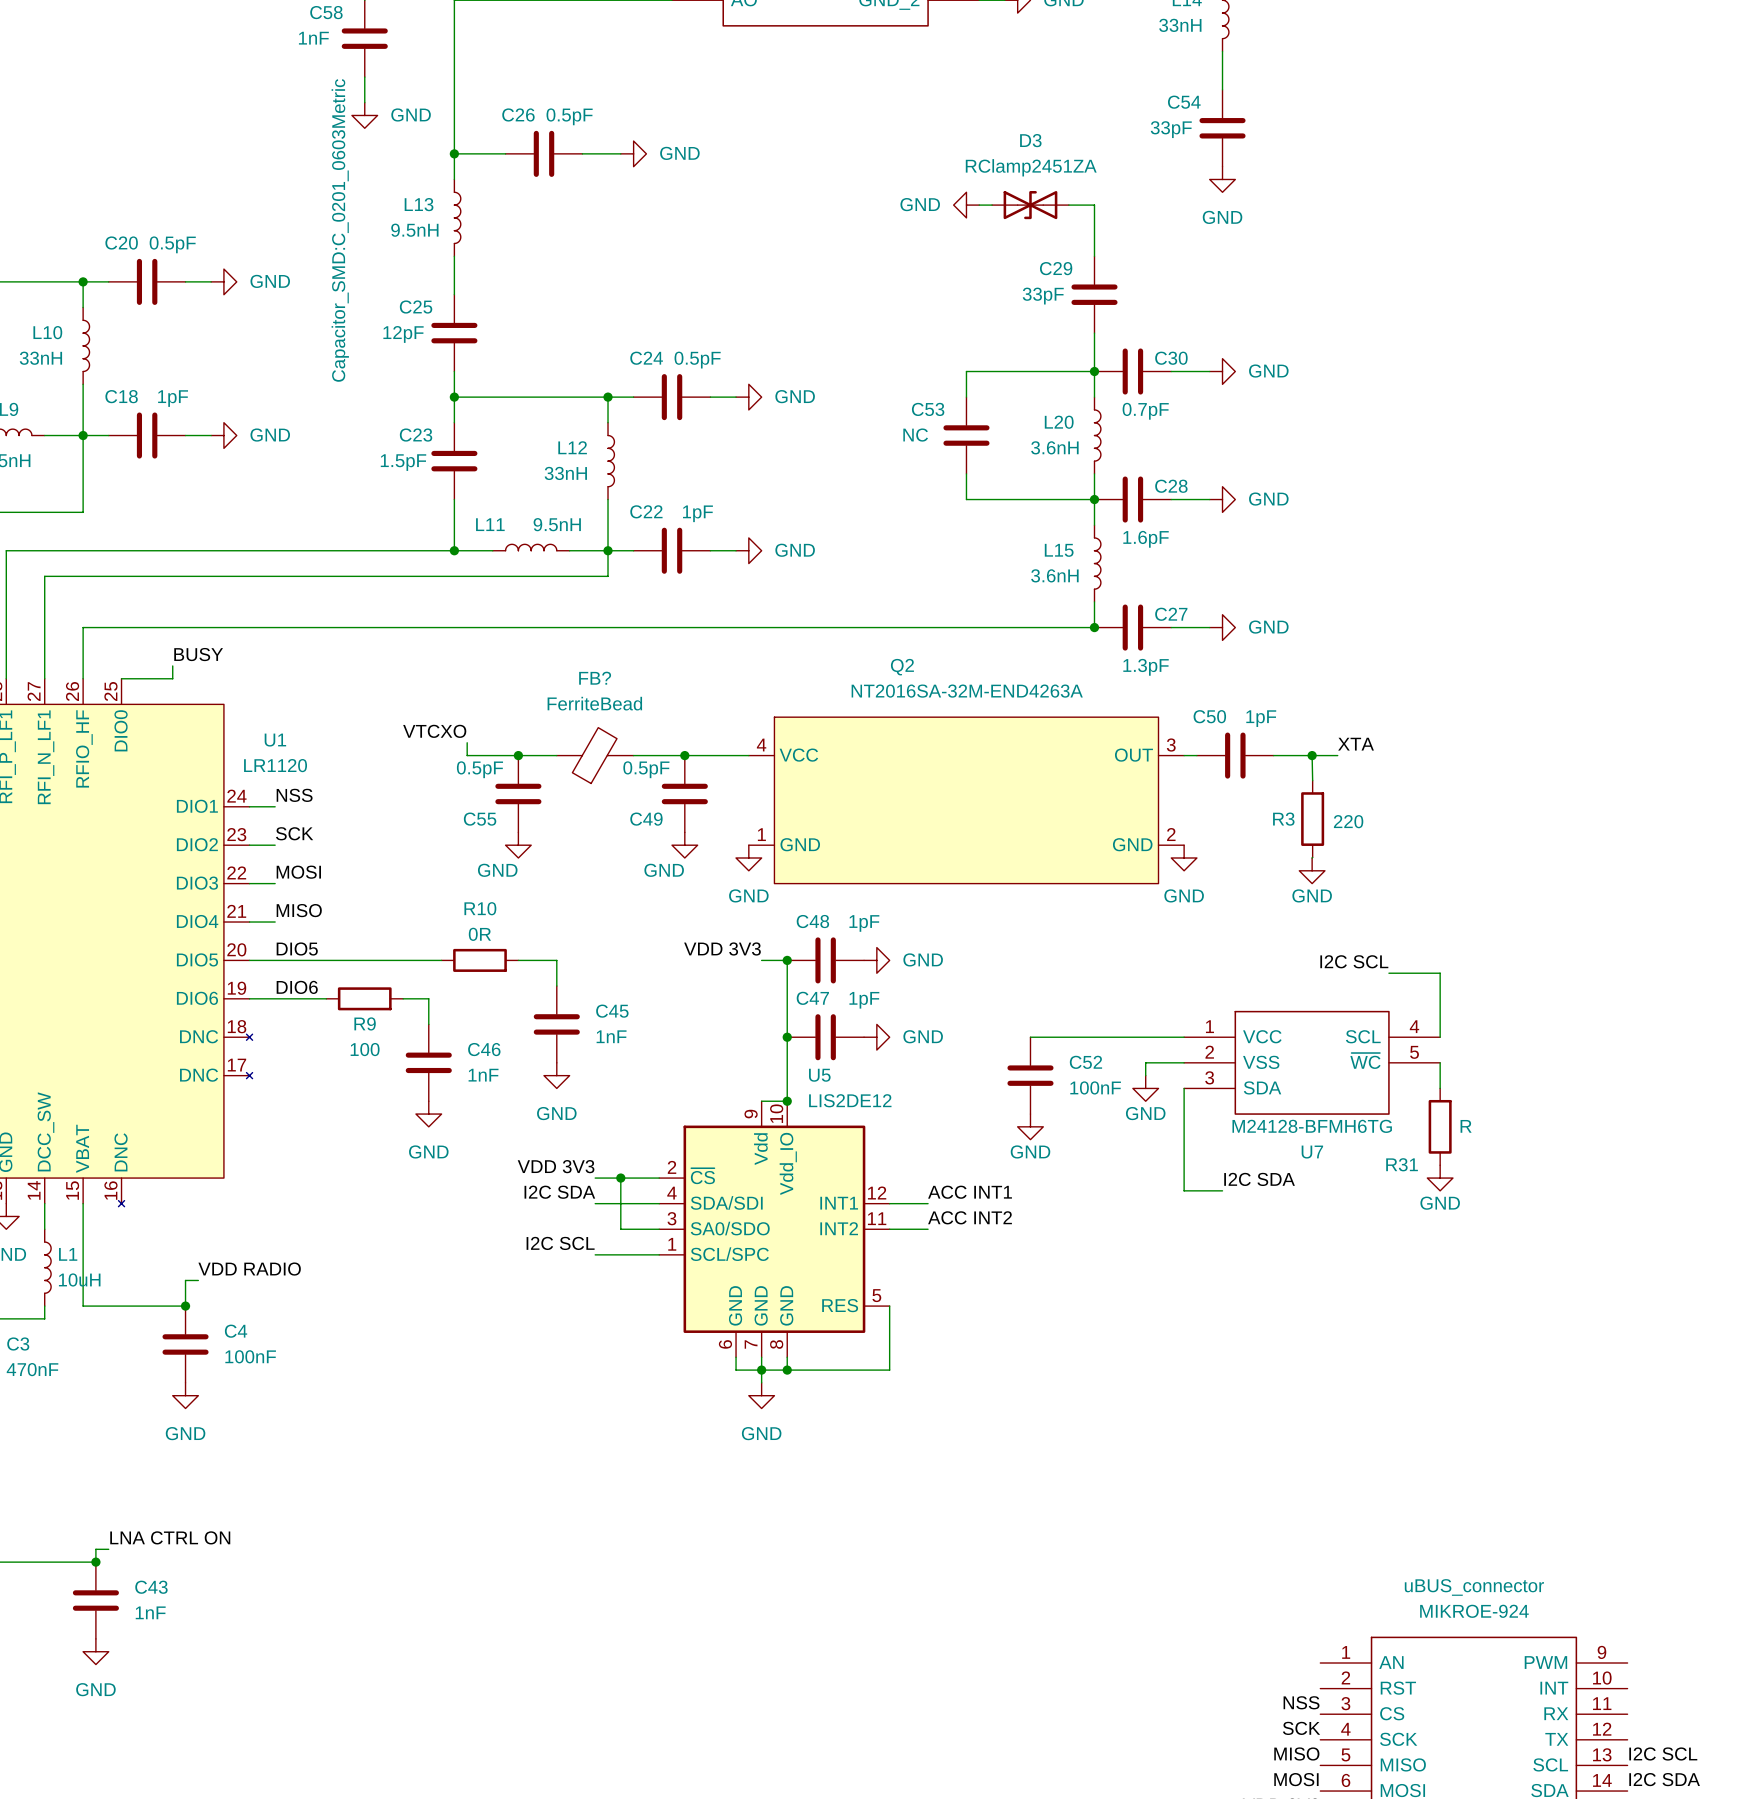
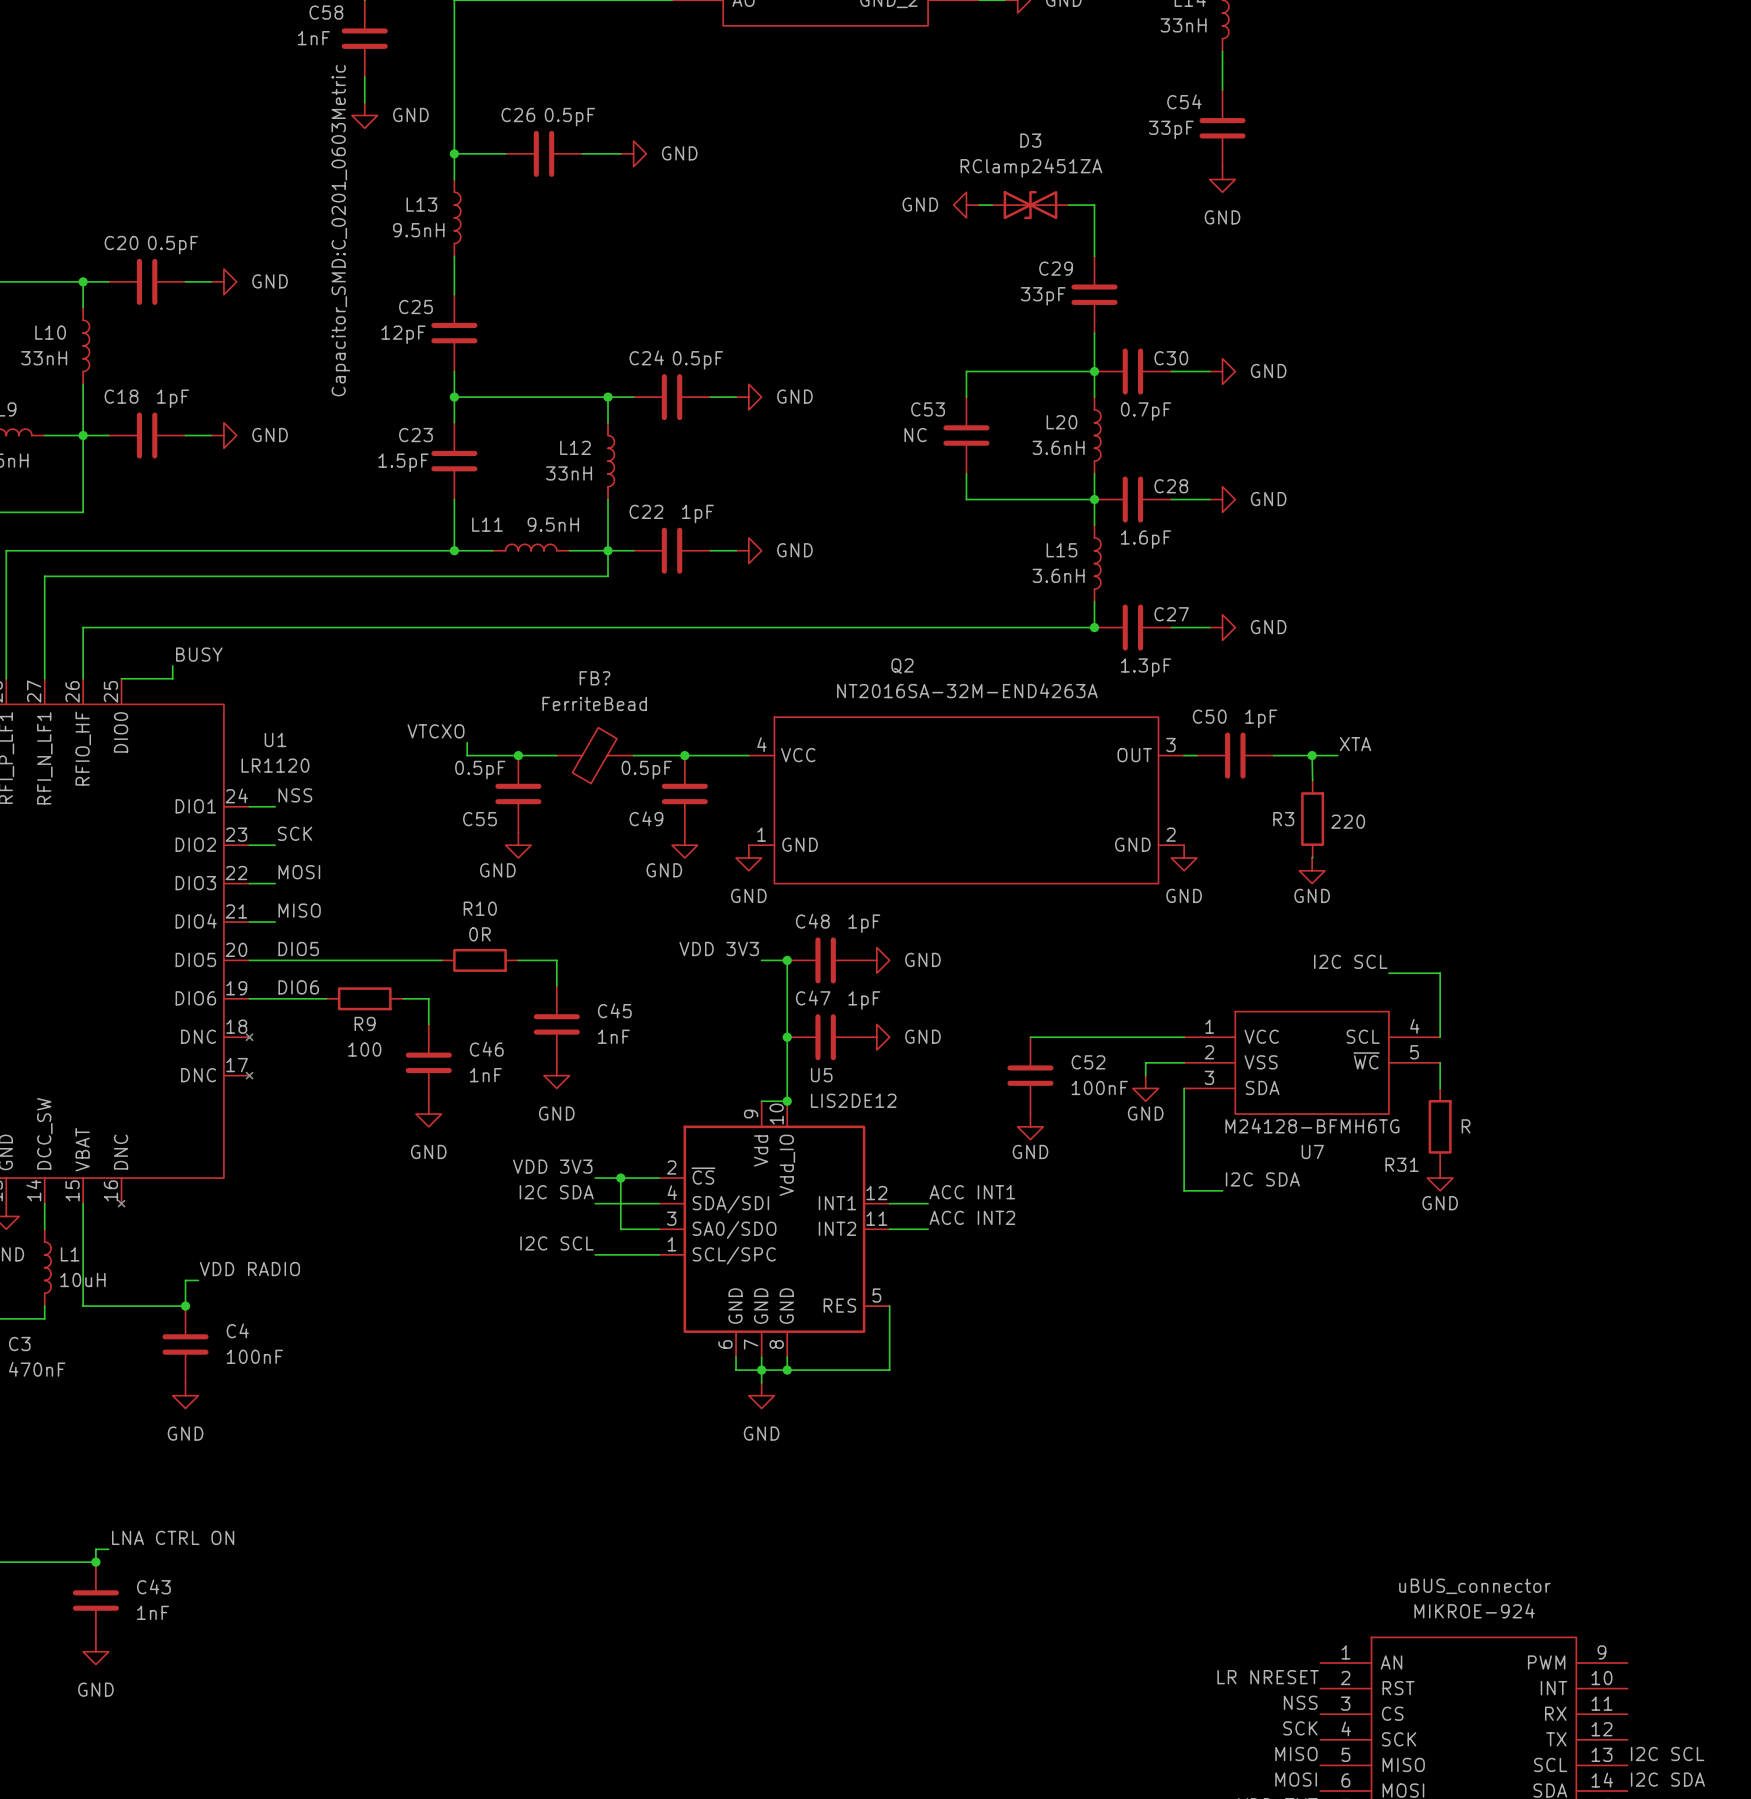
label: none -> LR NRESET (1268, 1677)

